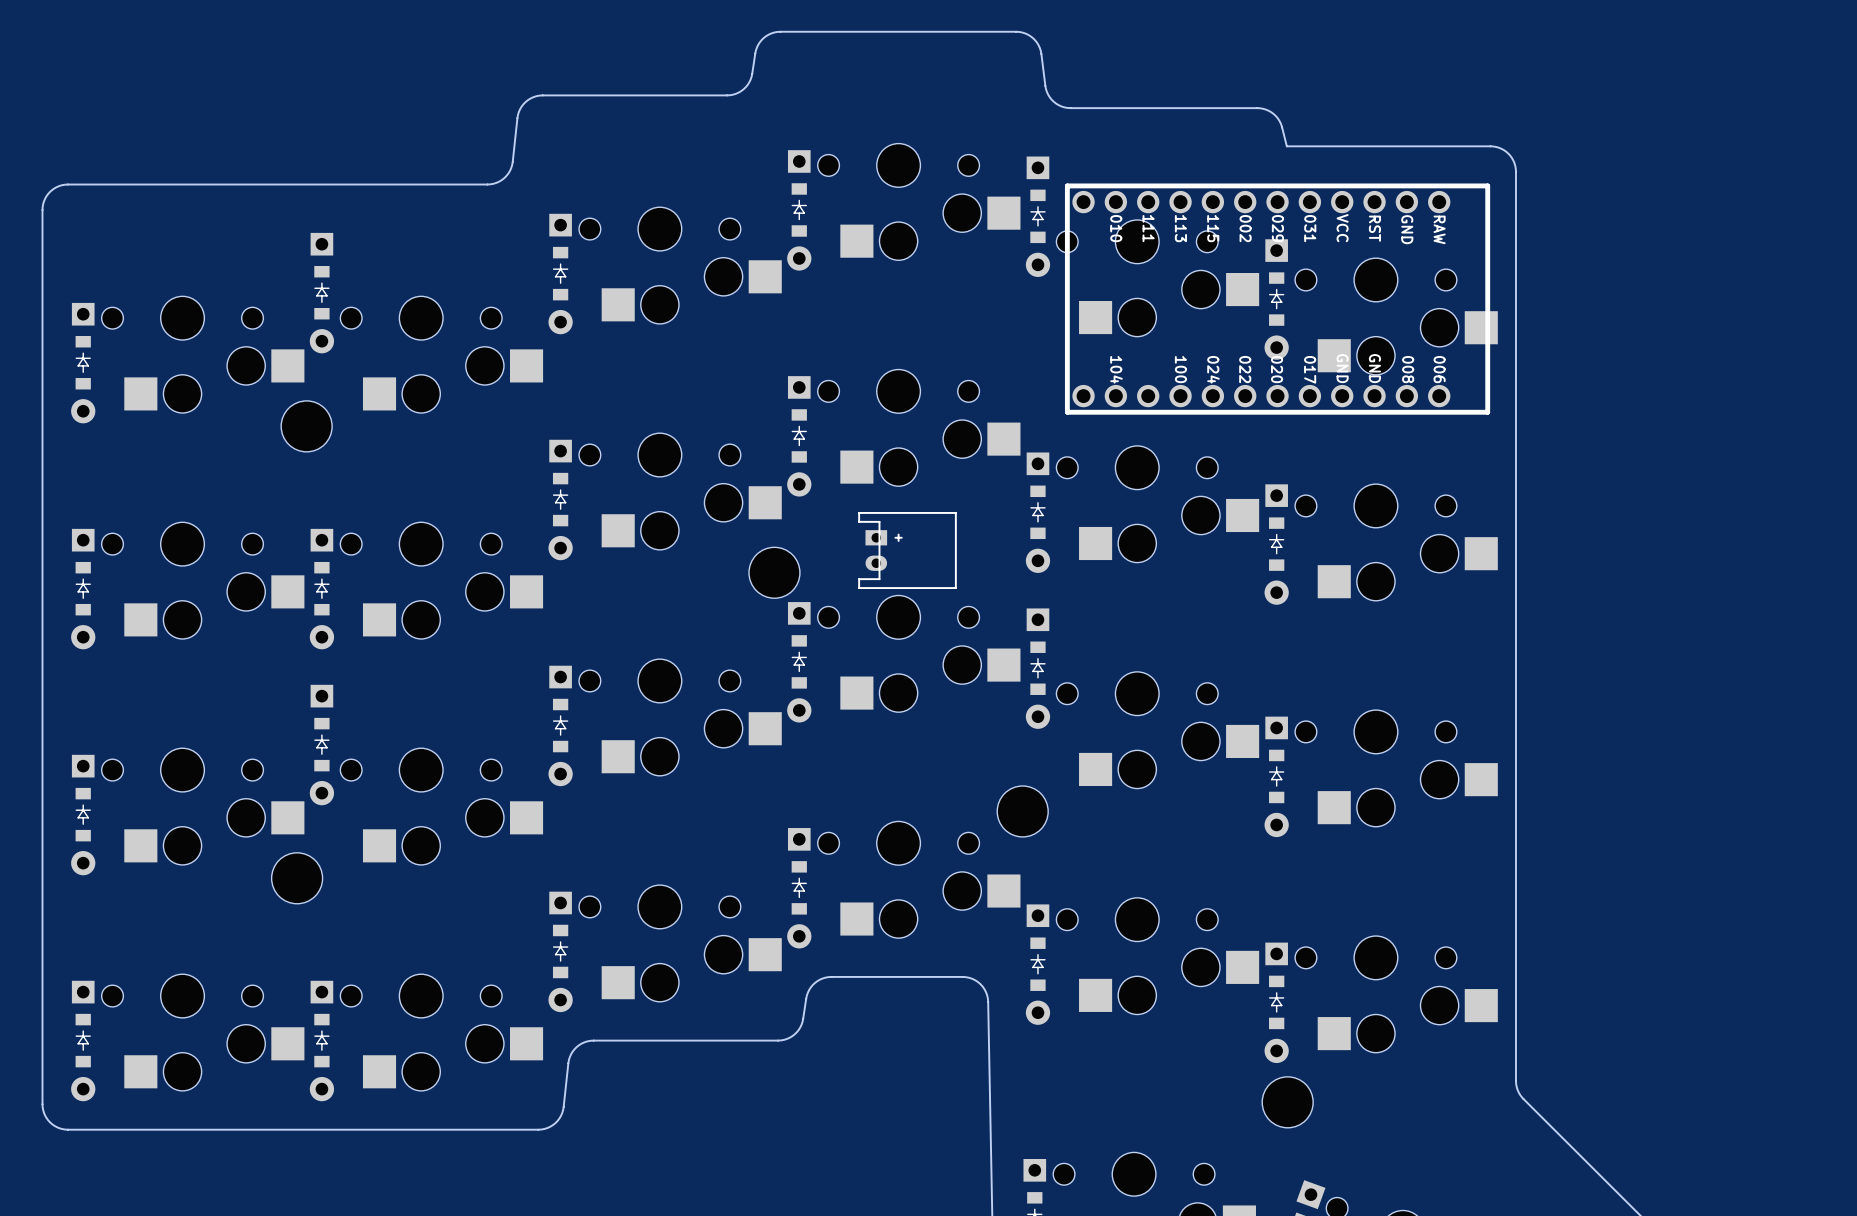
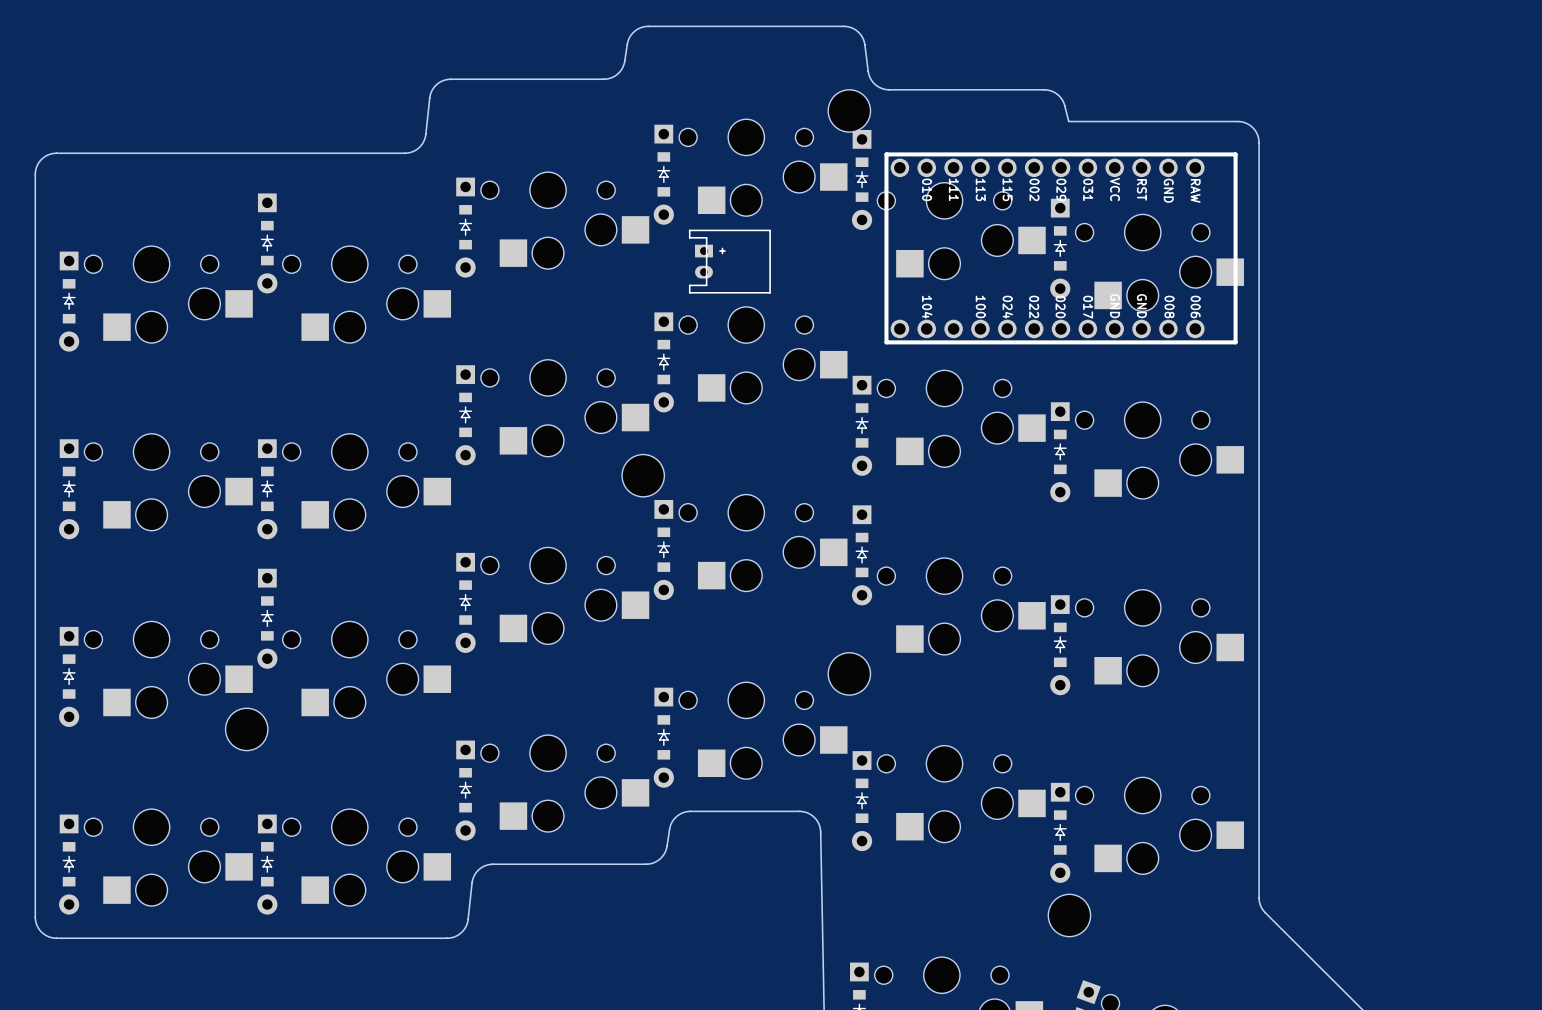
part: none -> (849, 110)
part: (306, 426) -> none
part position: (907, 550) -> (729, 261)

